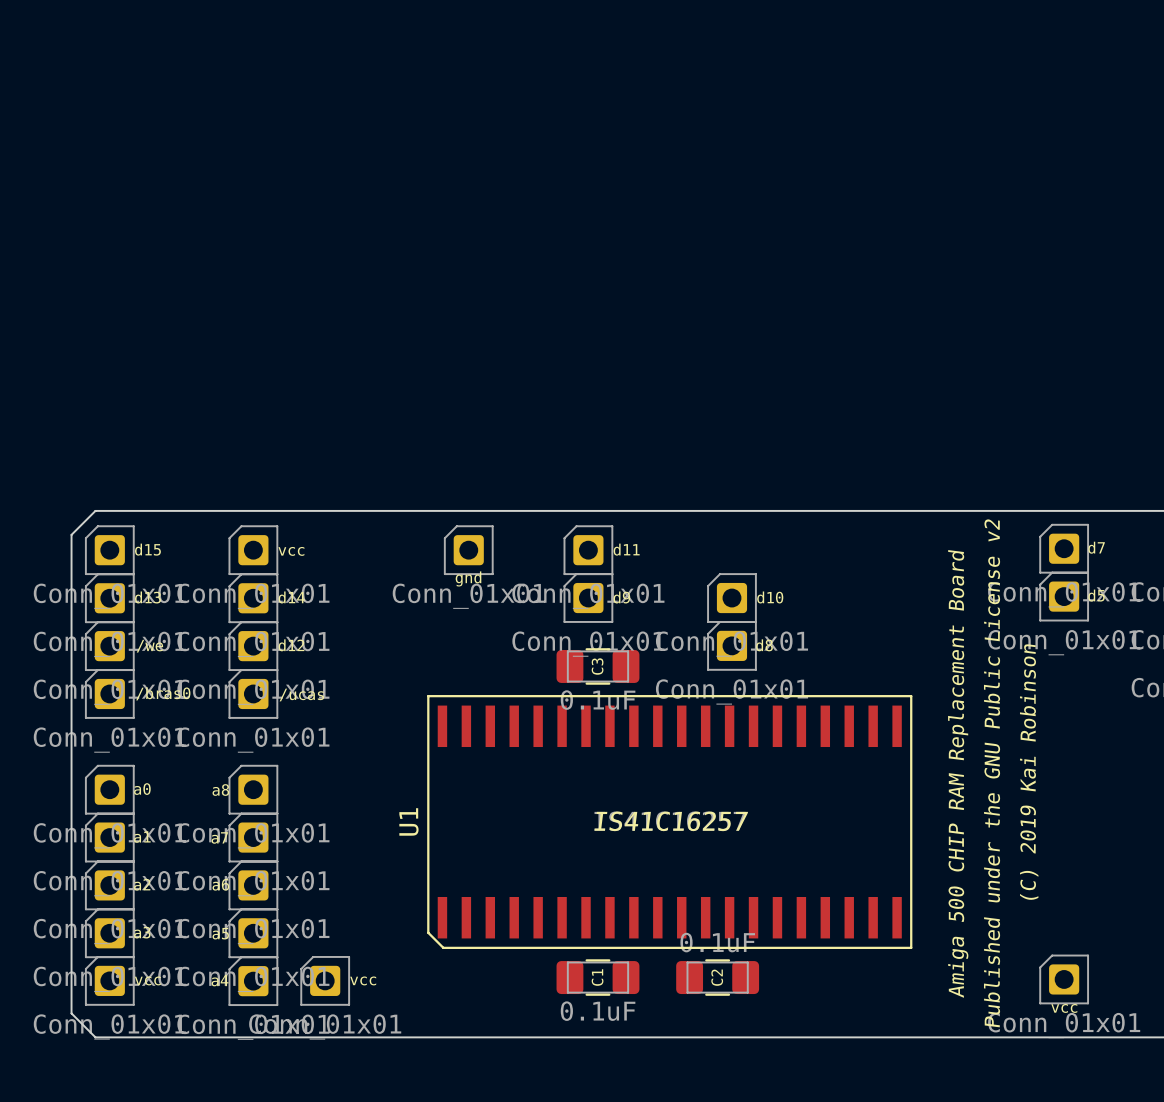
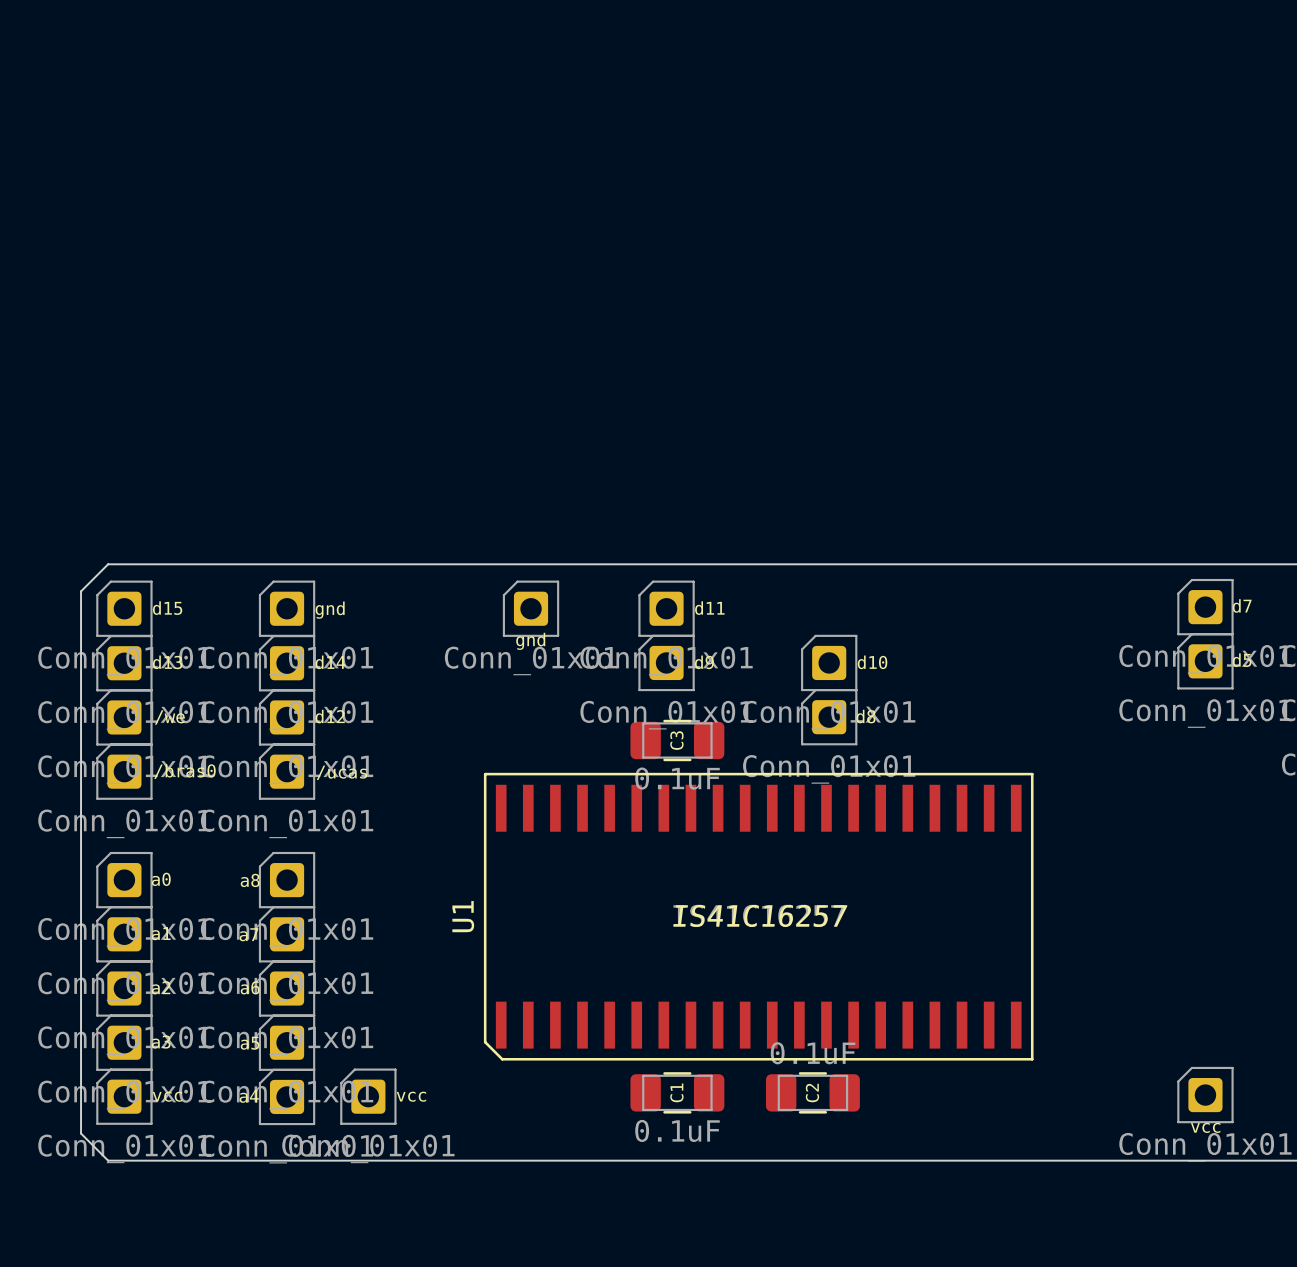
text: vcc (291, 551) -> gnd (330, 610)
text: (C) 2019 Kai Robinson (1029, 772) -> none
text: Amiga 500 CHIP RAM Replacement Board (958, 773) -> none
text: Published under the GNU Public License v2 (992, 773) -> none

